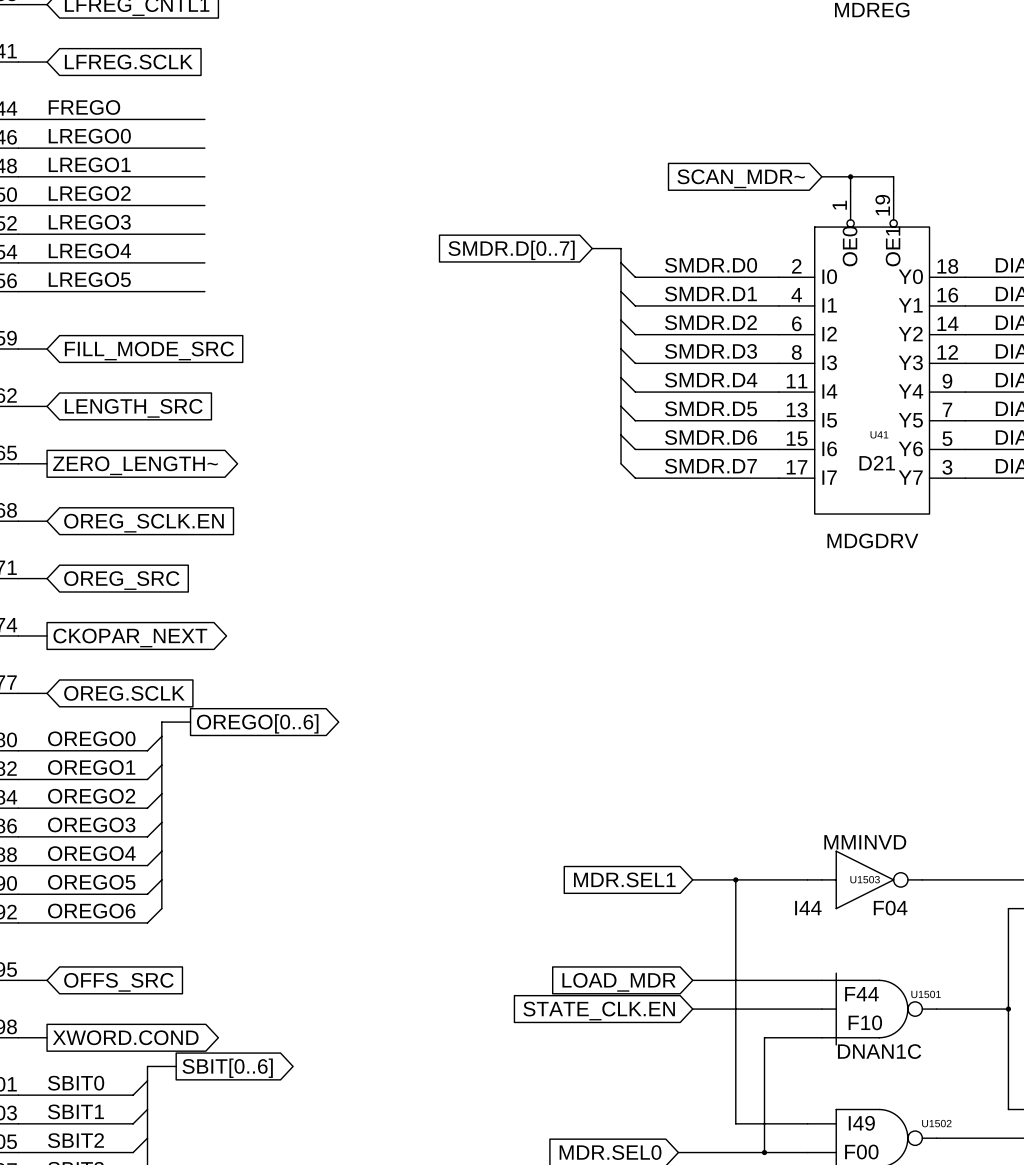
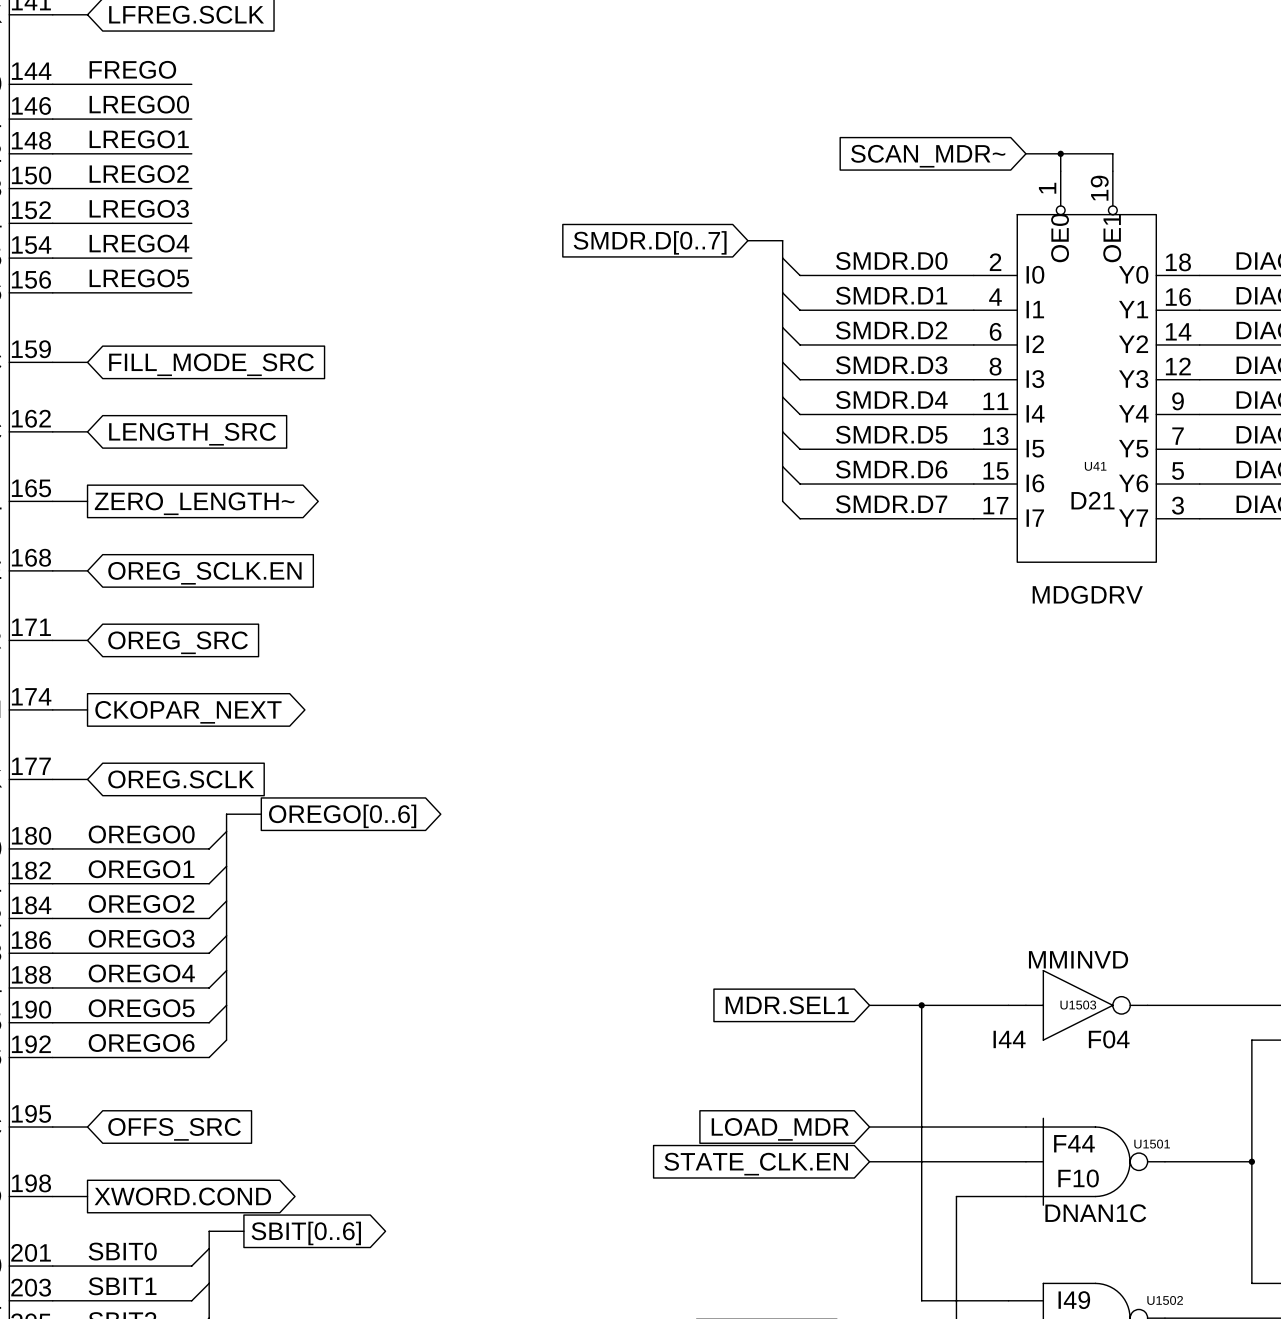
wire: (133, 119) (204, 119) -> none
wire: (133, 148) (204, 148) -> none
wire: (133, 176) (204, 176) -> none
wire: (133, 205) (204, 205) -> none
wire: (133, 234) (204, 234) -> none
wire: (133, 262) (204, 262) -> none
wire: (133, 291) (204, 291) -> none

